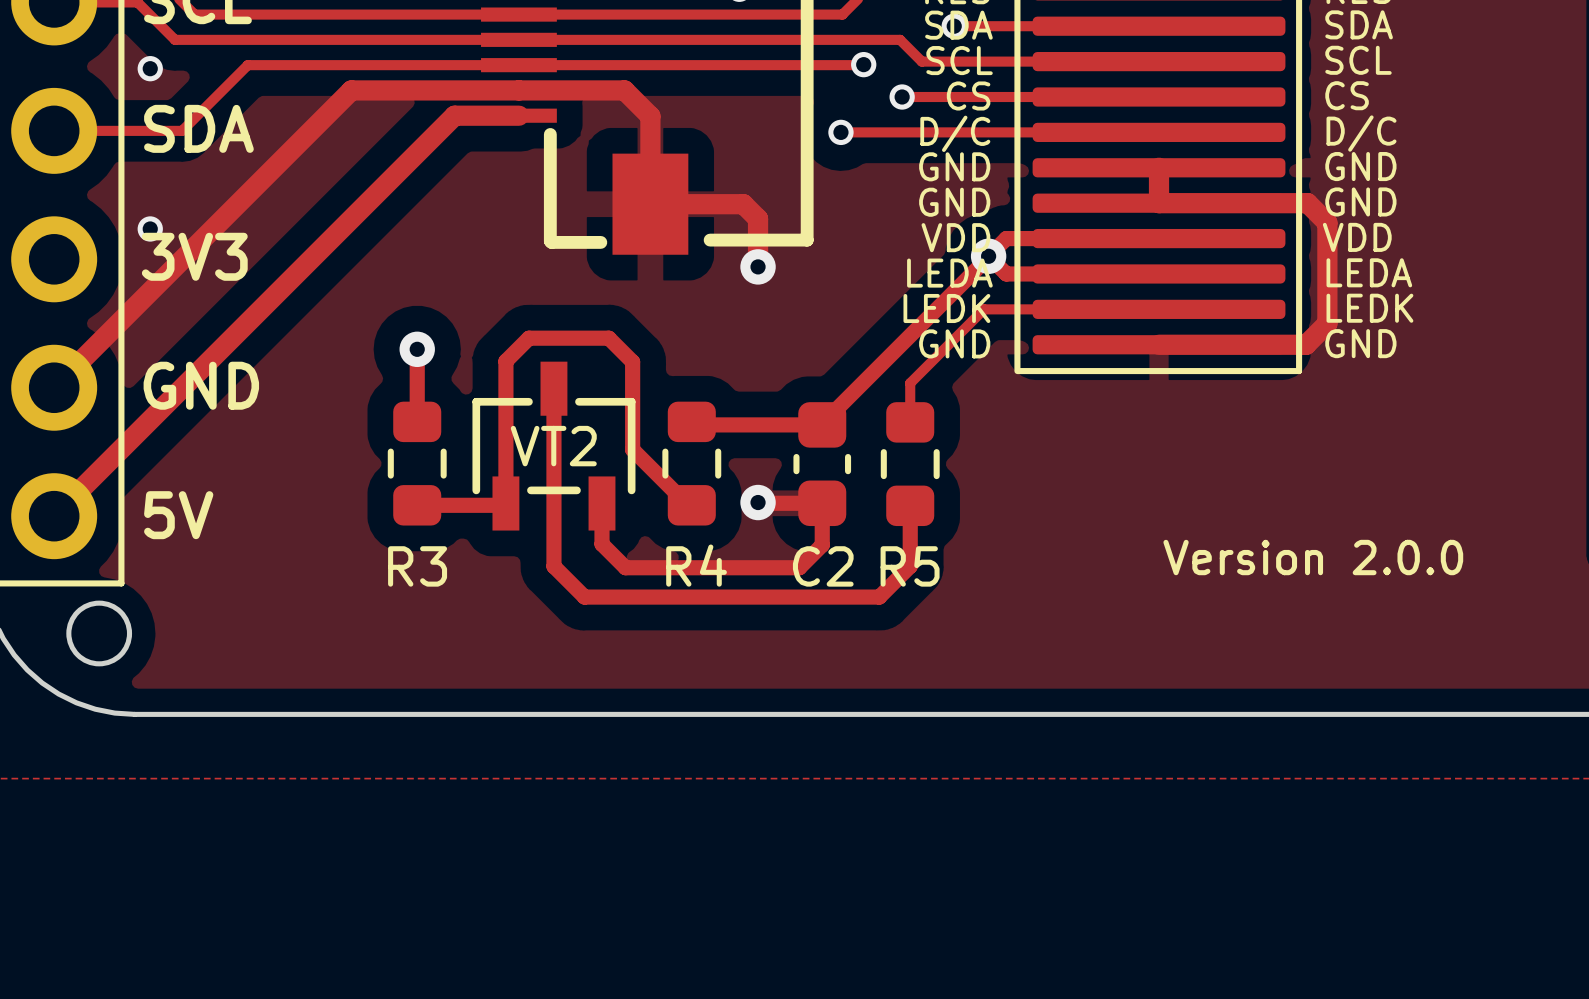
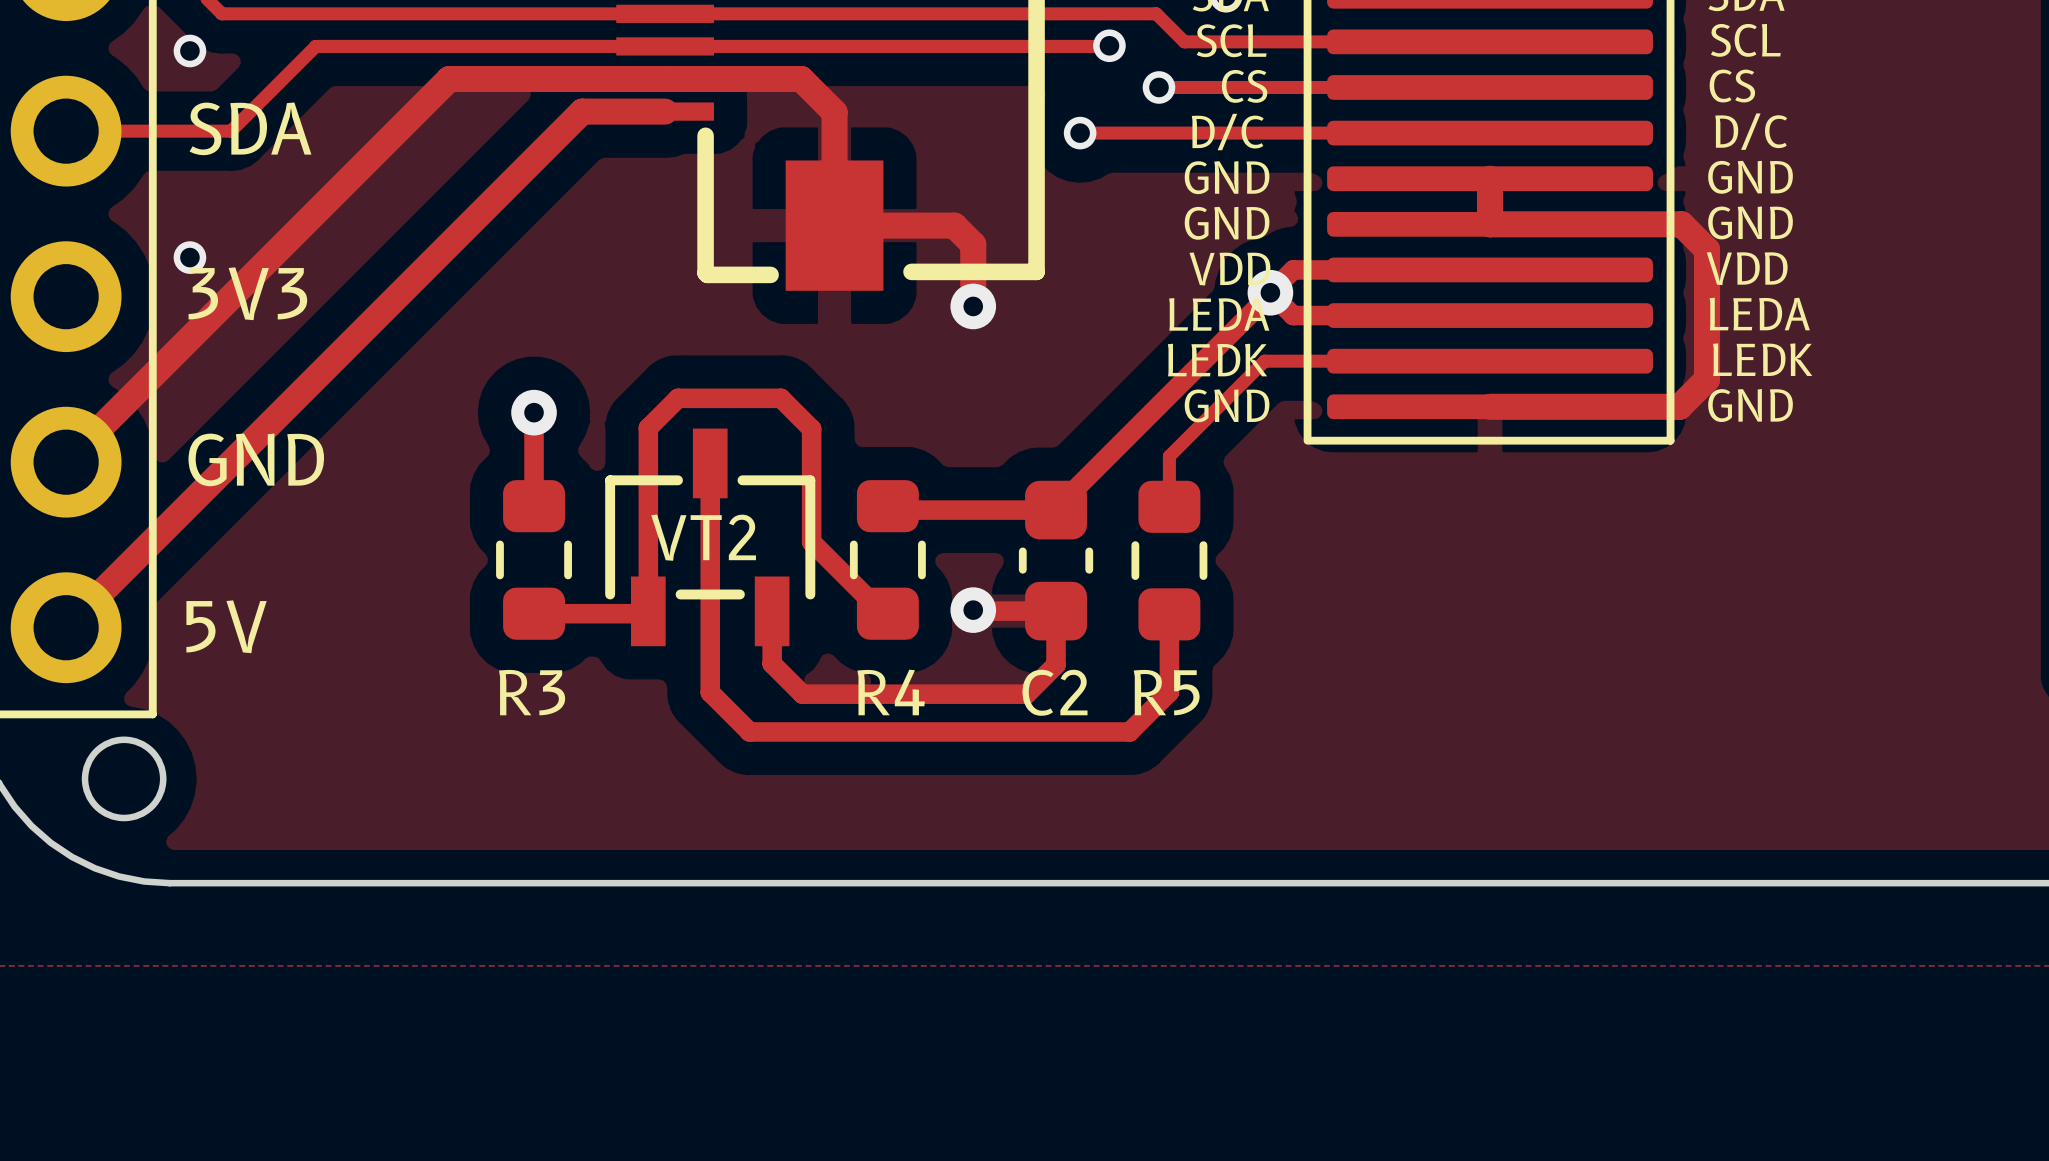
text: Version 2.0.0 (1313, 557) -> none

